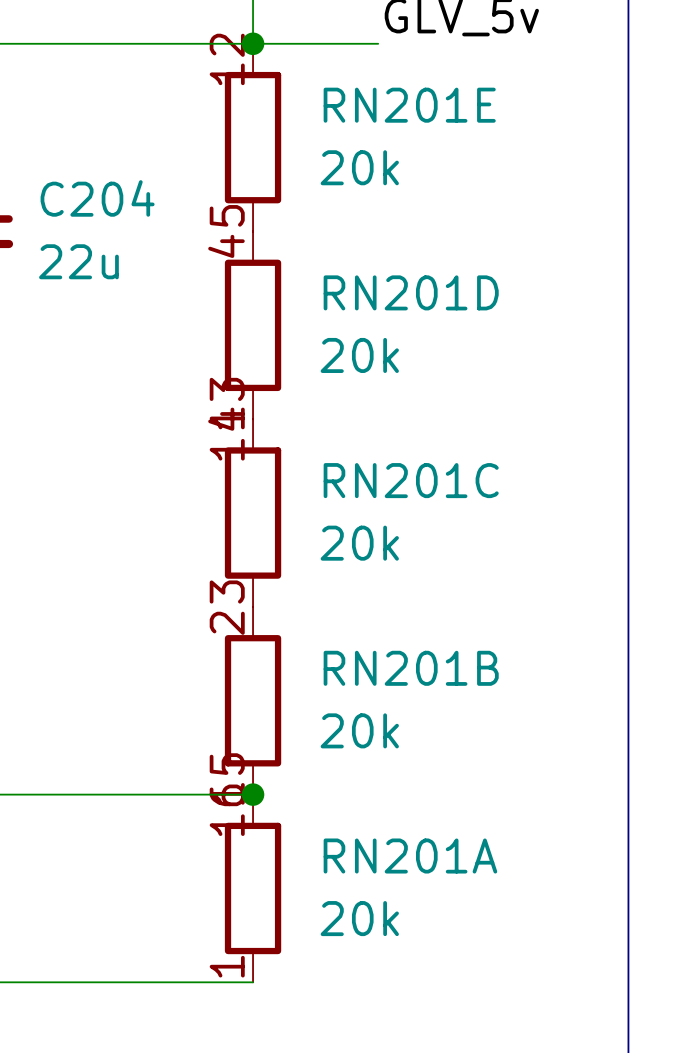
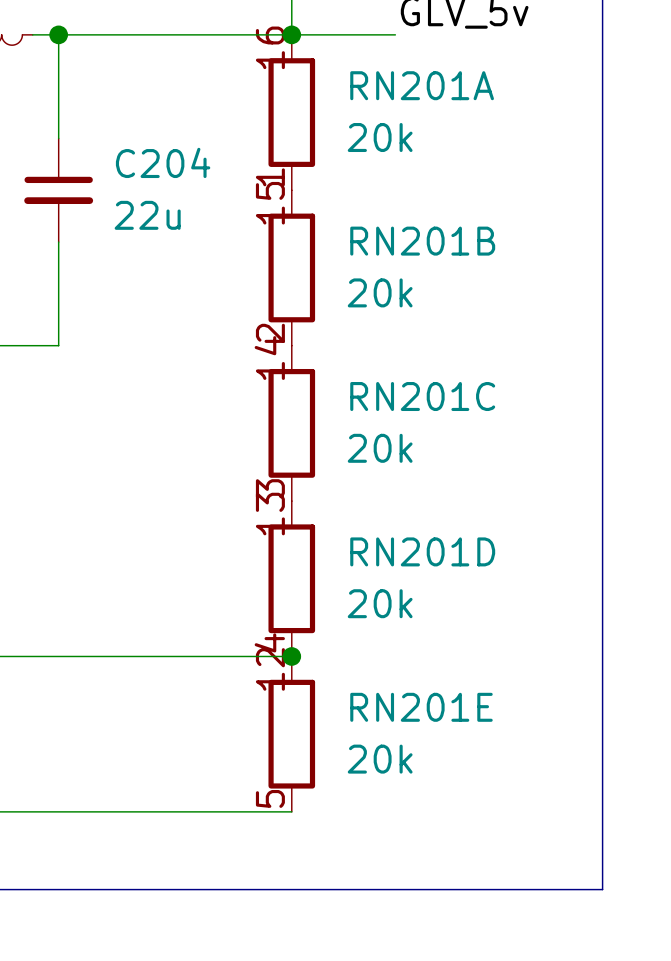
RN201E position: (253, 137) -> (291, 734)
RN201D rotation: 0° (253, 325) -> 180° (291, 578)
RN201D position: (253, 325) -> (291, 578)
RN201B rotation: 0° (253, 700) -> 180° (291, 267)
RN201B position: (253, 700) -> (291, 267)
RN201A position: (253, 888) -> (291, 112)

